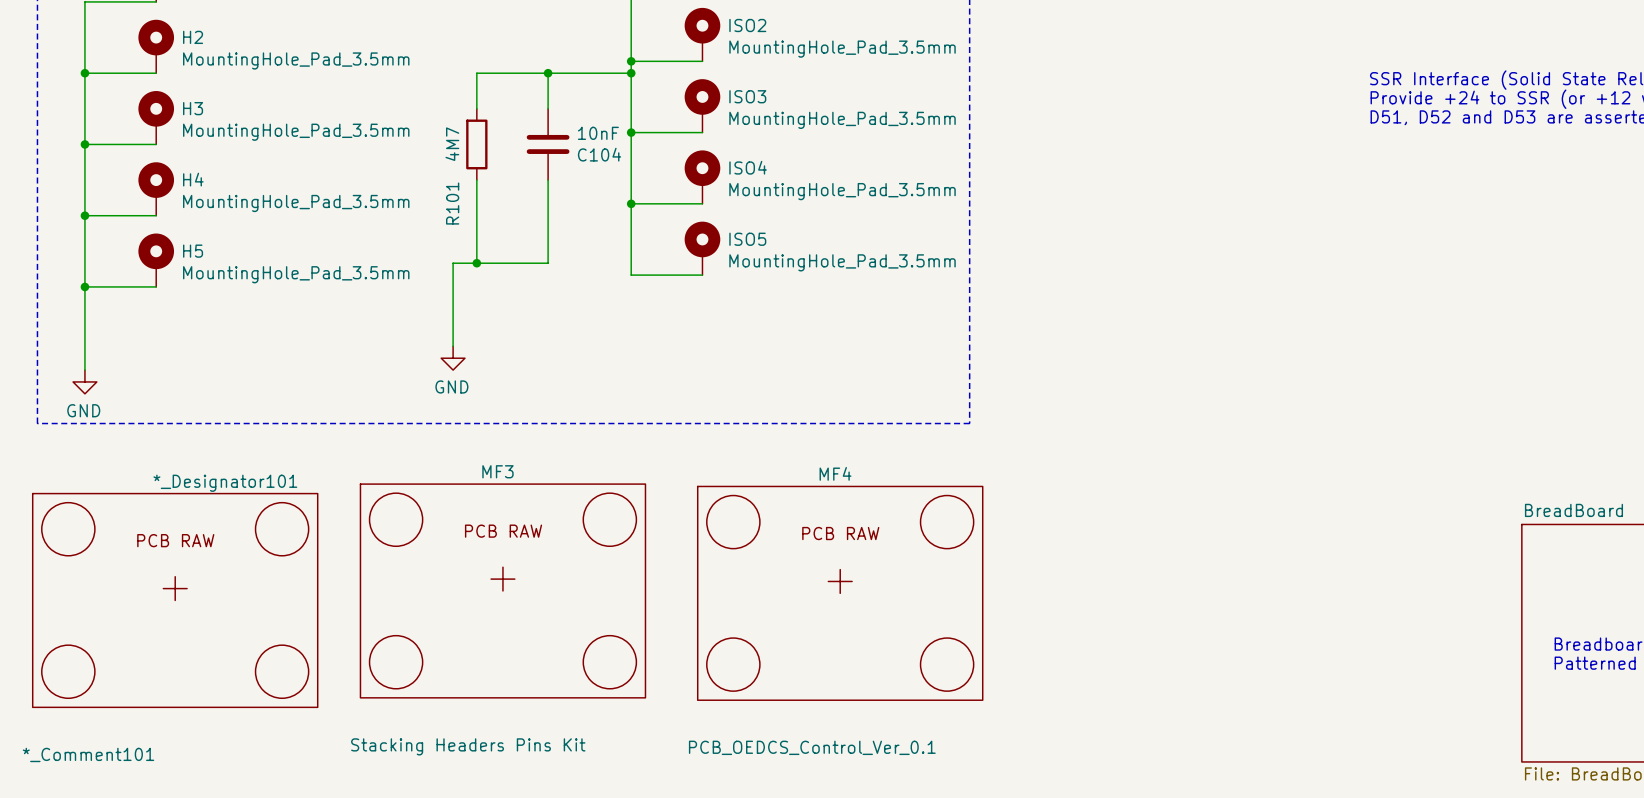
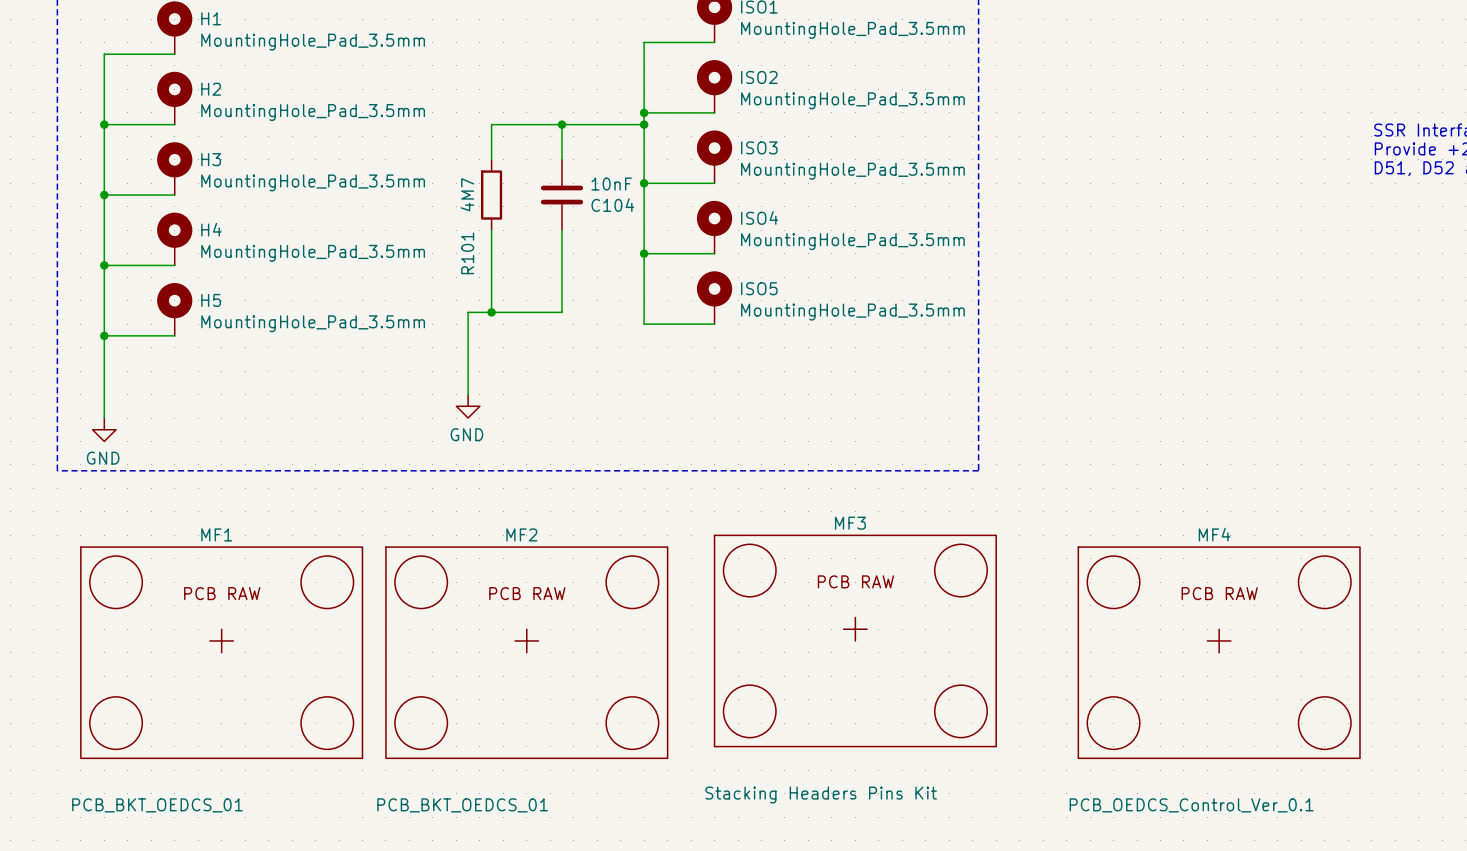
MF3 position: (502, 590) -> (855, 640)
MF4 position: (840, 593) -> (1219, 652)
*_Designator101: *_Comment101 (175, 600) -> none
MF1: none -> PCB_BKT_OEDCS_01 (221, 652)
MF2: none -> PCB_BKT_OEDCS_01 (526, 652)

